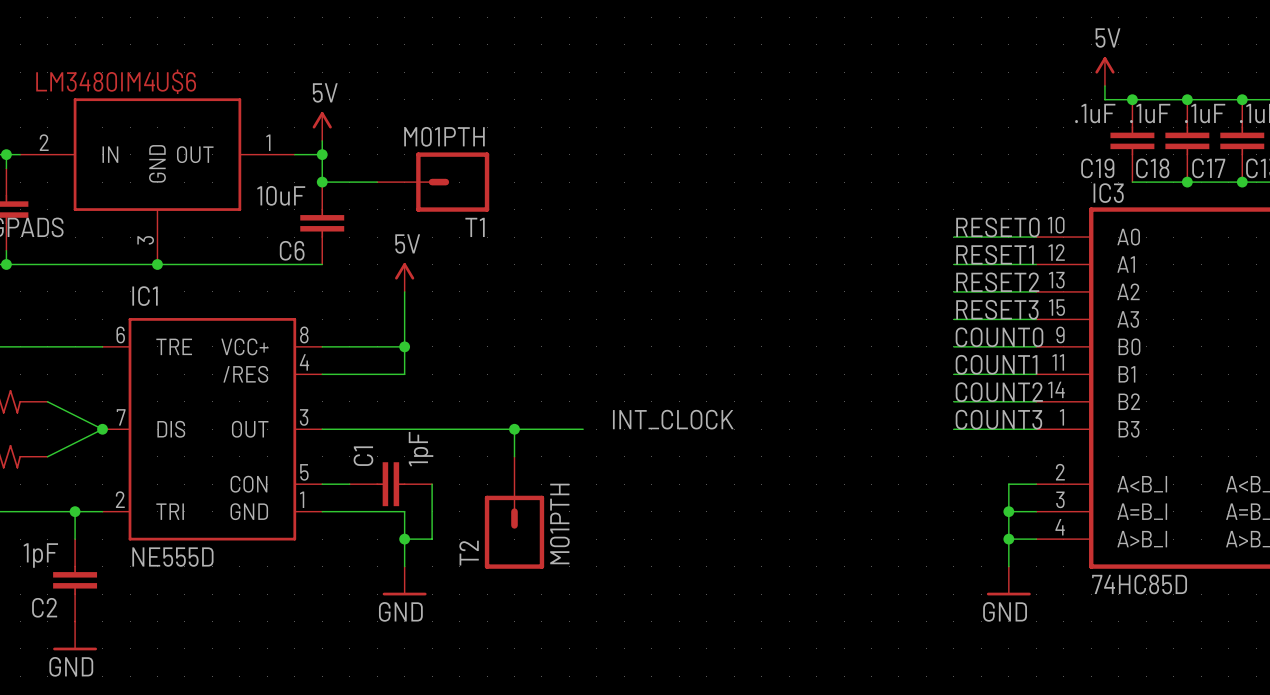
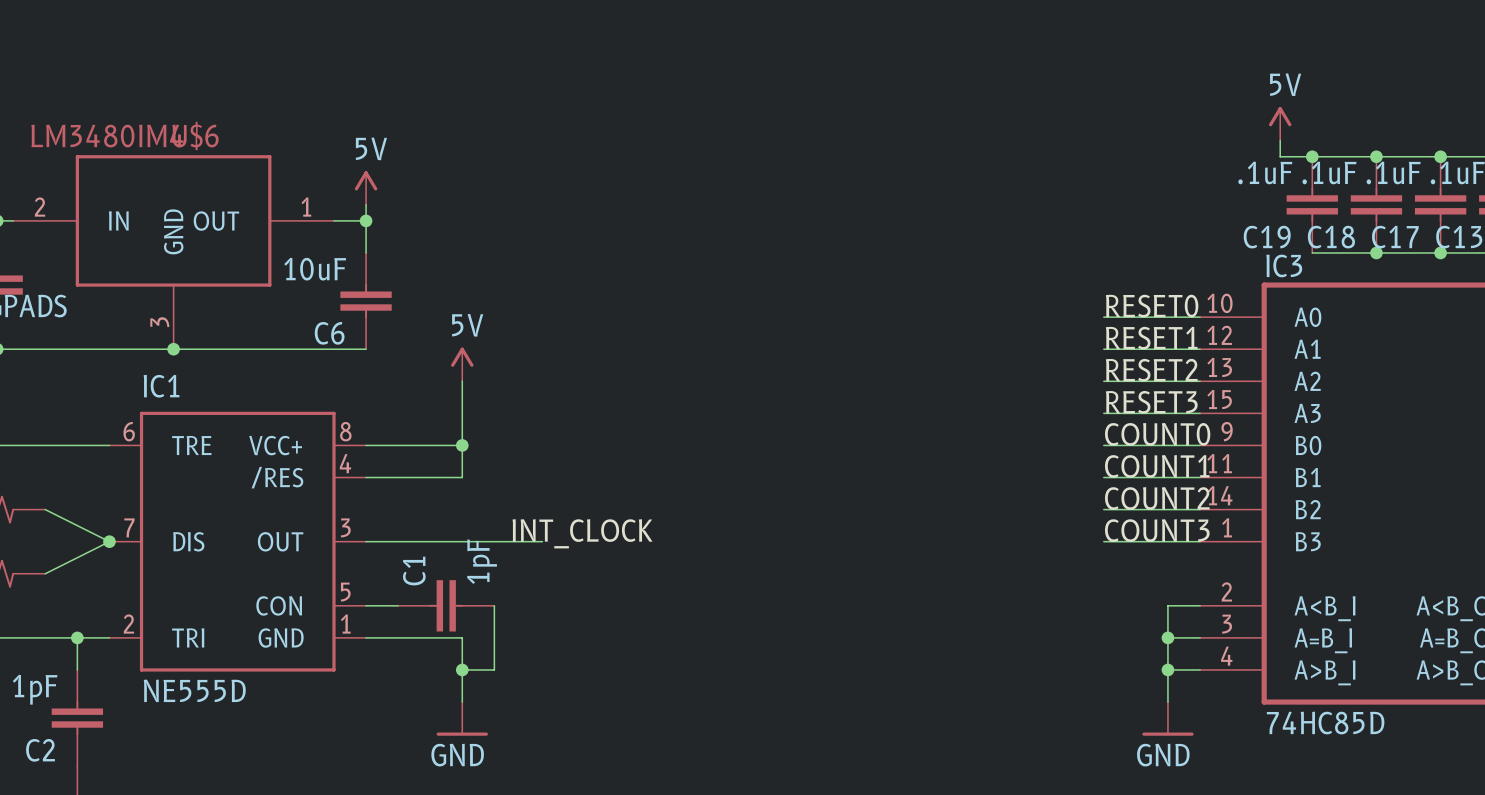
wire: (322, 182) (377, 182) -> none
junction: (322, 182) -> none
T1: M01PTH (433, 182) -> none
label position: INT_CLOCK (673, 419) -> INT_CLOCK (582, 533)
wire: (473, 429) (583, 429) -> none
wire: (514, 429) (514, 456) -> none
junction: (514, 429) -> none
T2: M01PTH (514, 512) -> none

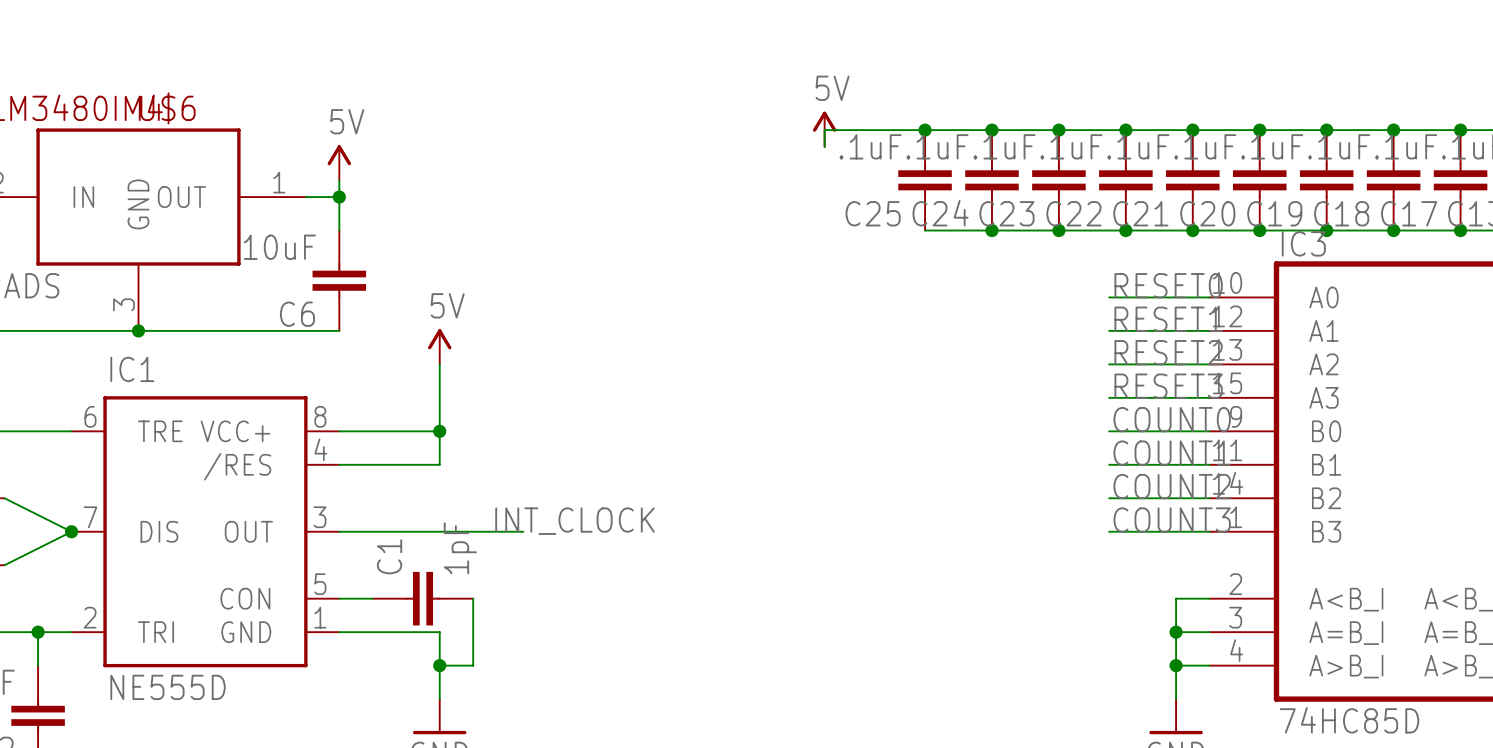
power symbol: 5V (1280, 123) -> none
wire: (1280, 140) (1280, 156) -> (824, 146) (824, 130) (1293, 130)
power symbol: none -> 5V (824, 129)
junction: none -> (925, 130)
junction: none -> (991, 130)
junction: none -> (1058, 130)
junction: none -> (1125, 130)
junction: none -> (1192, 130)
junction: none -> (1259, 130)
C25: none -> .1uF (925, 180)
C24: none -> .1uF (991, 180)
C23: none -> .1uF (1058, 180)
C22: none -> .1uF (1125, 180)
C21: none -> .1uF (1192, 180)
C20: none -> .1uF (1259, 180)
wire: none -> (925, 230) (1326, 230)
junction: none -> (991, 230)
junction: none -> (1058, 230)
junction: none -> (1125, 230)
junction: none -> (1192, 230)
junction: none -> (1259, 230)
junction: none -> (1326, 230)

